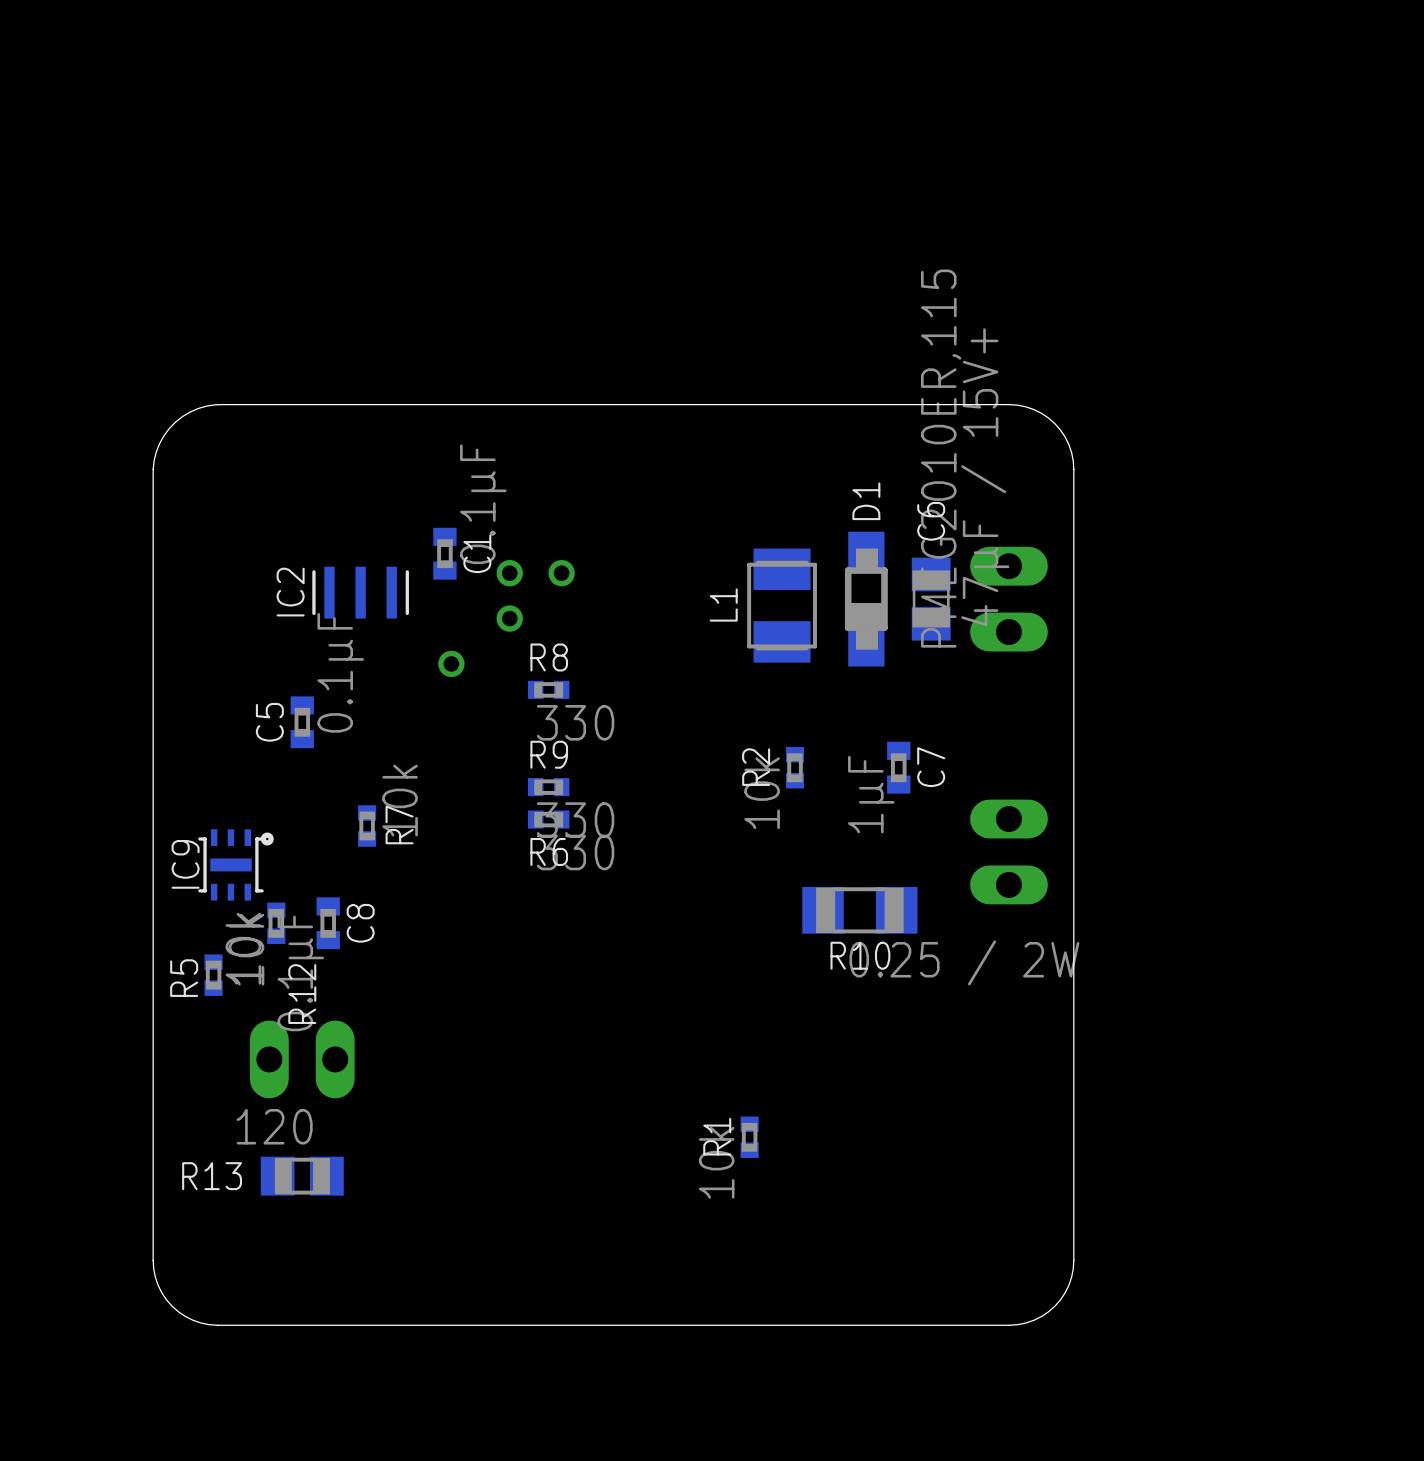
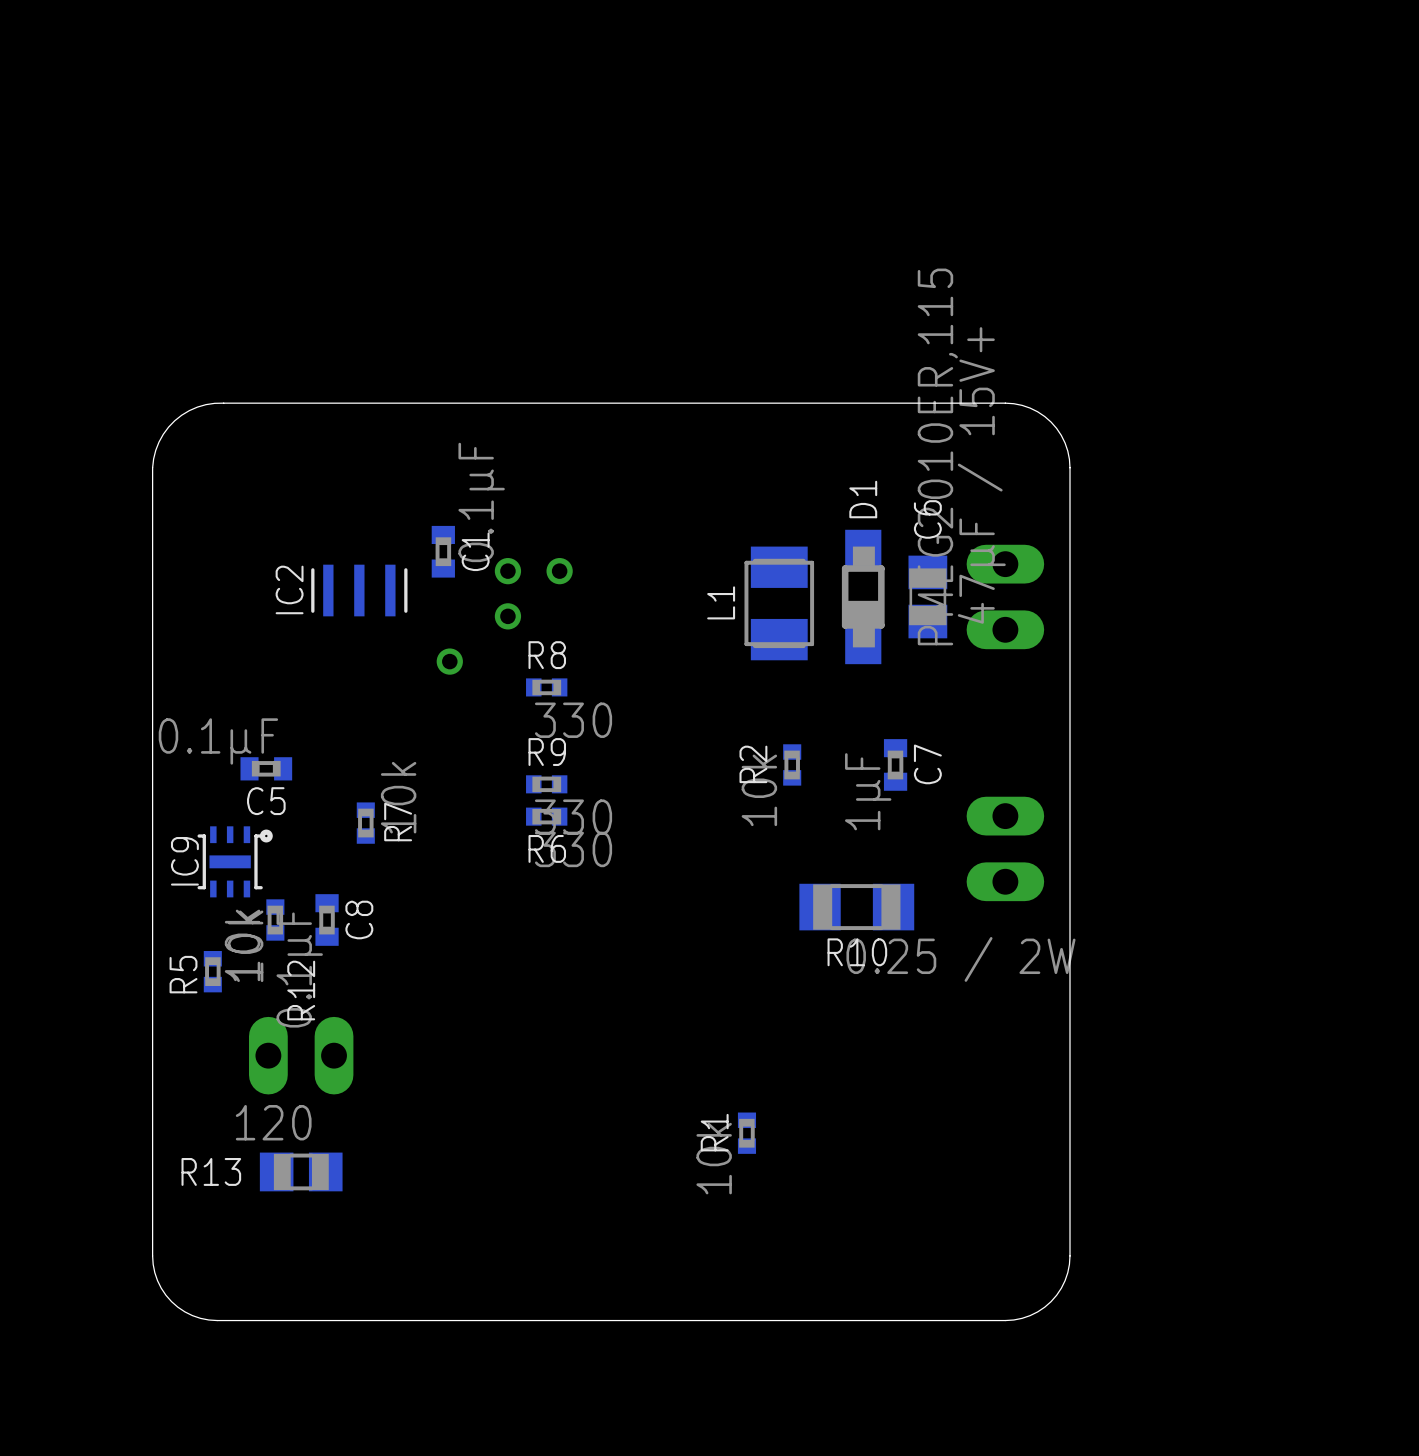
C5 value position: 0.1μF (340, 672) -> 0.1μF (218, 741)
C5 rotation: 0° (302, 722) -> 90° clockwise (266, 768)
C5 position: (302, 722) -> (266, 768)

